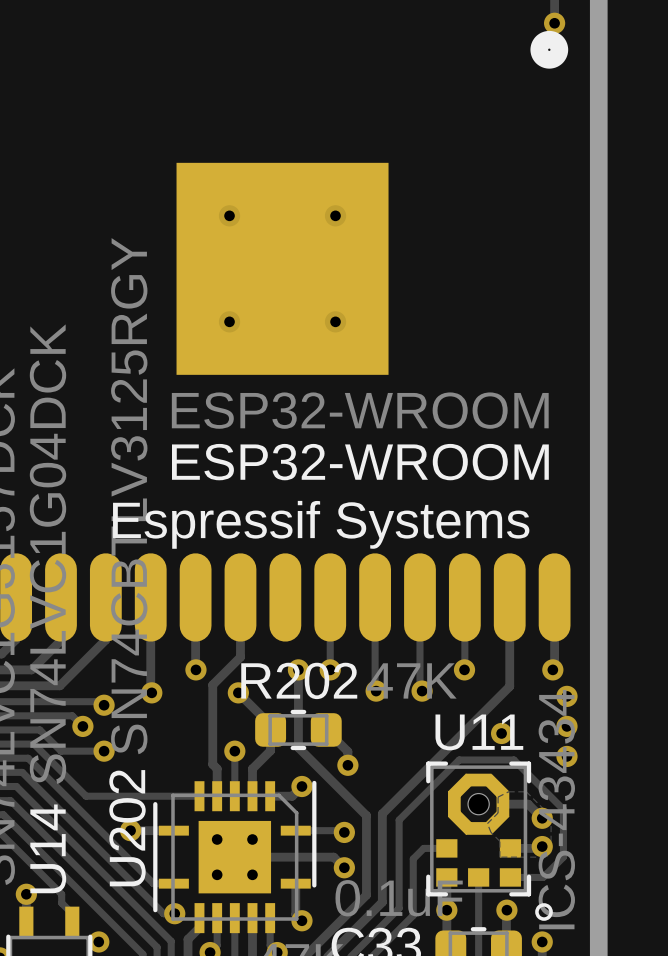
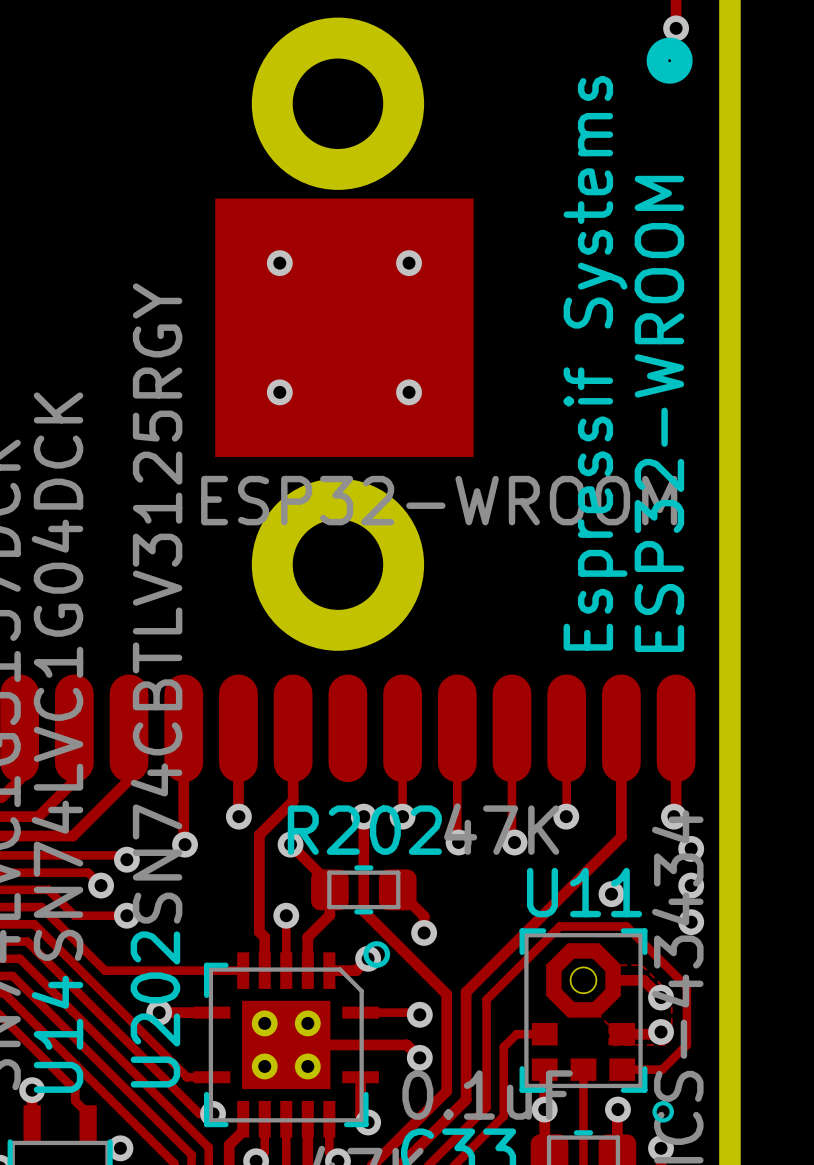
part: none -> (337, 103)
part text rotation: 0° (360, 462) -> 90° counterclockwise (659, 413)
part: none -> (337, 564)
part text rotation: 0° (321, 524) -> 90° counterclockwise (595, 363)
U202 footprint: [153, 780, 317, 934] -> [193, 941, 391, 1138]

